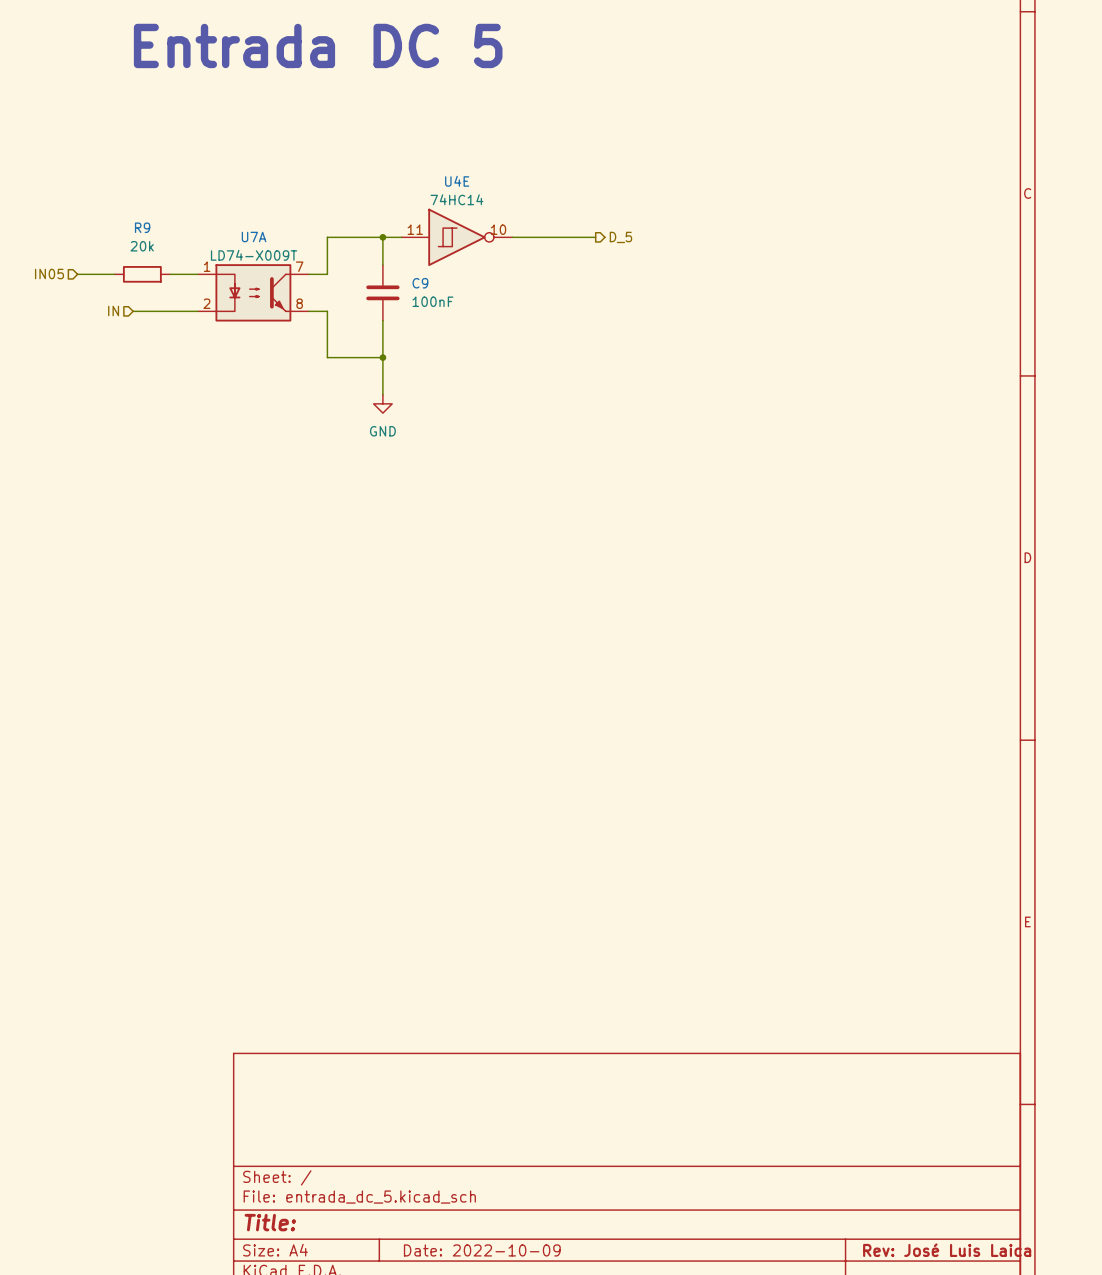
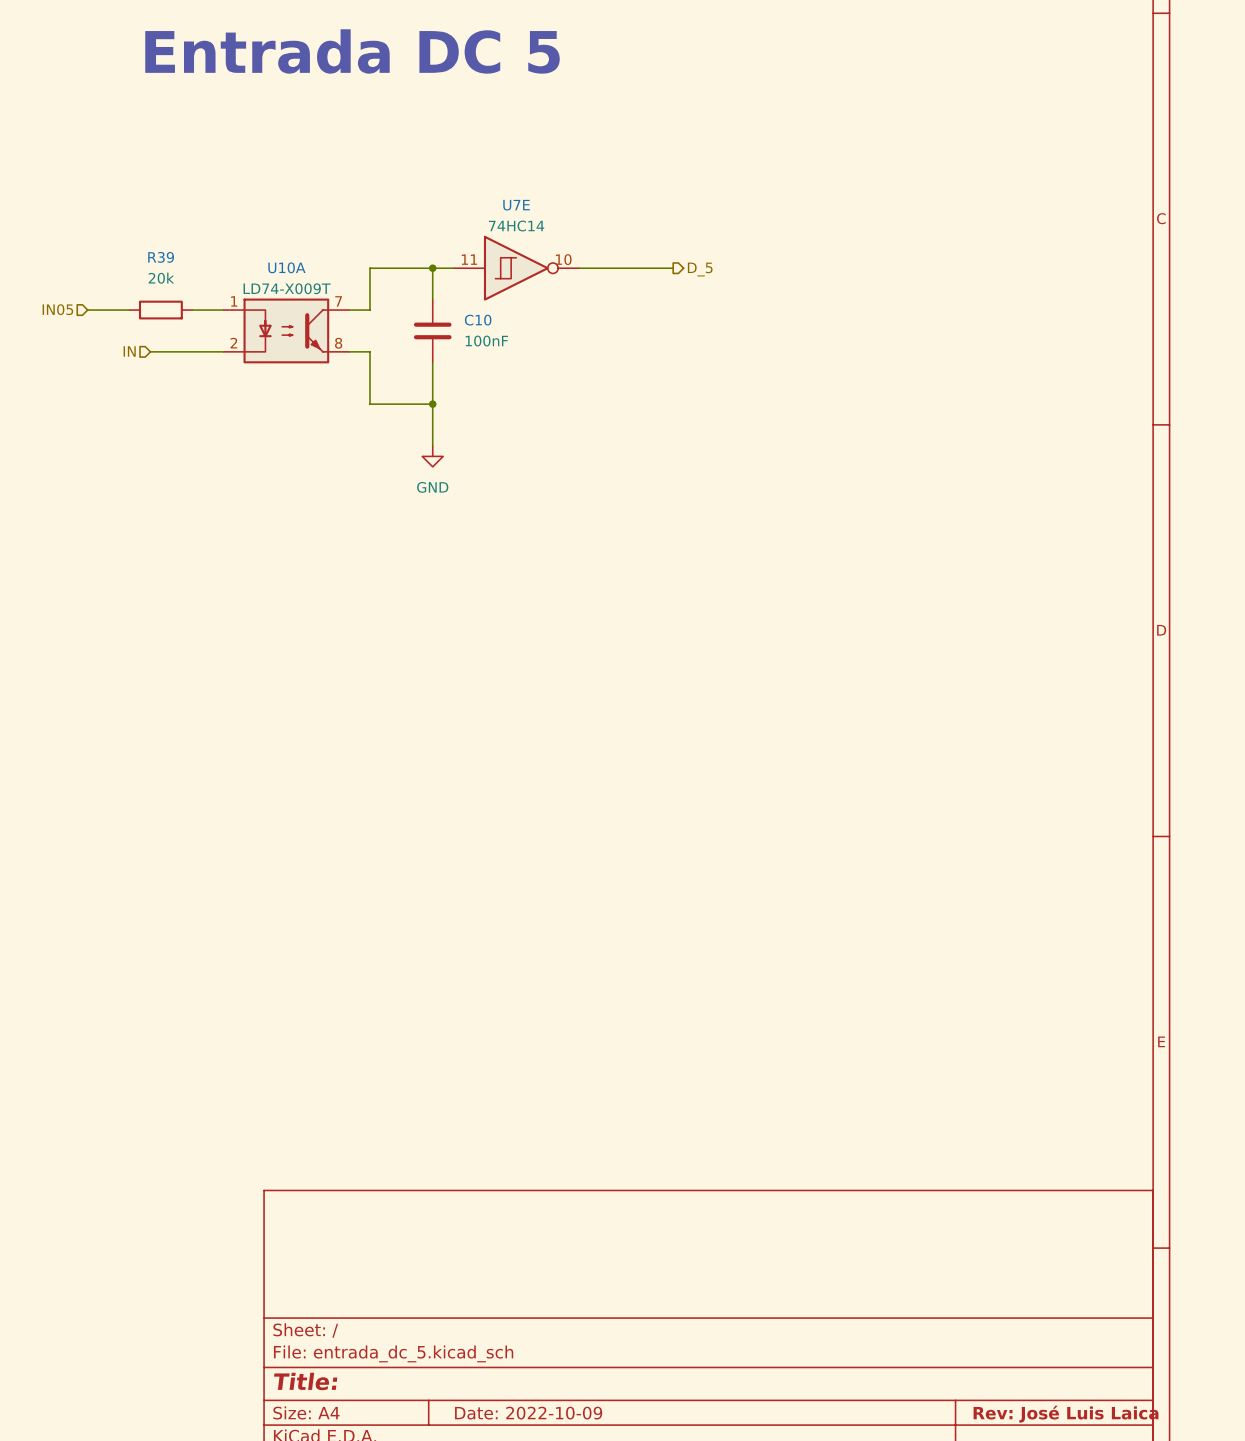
U4E name: U4E (457, 181) -> U7E (516, 205)
R9 name: R9 (142, 227) -> R39 (161, 257)
U7A name: U7A (254, 237) -> U10A (286, 267)
C9 name: C9 (420, 283) -> C10 (478, 320)

